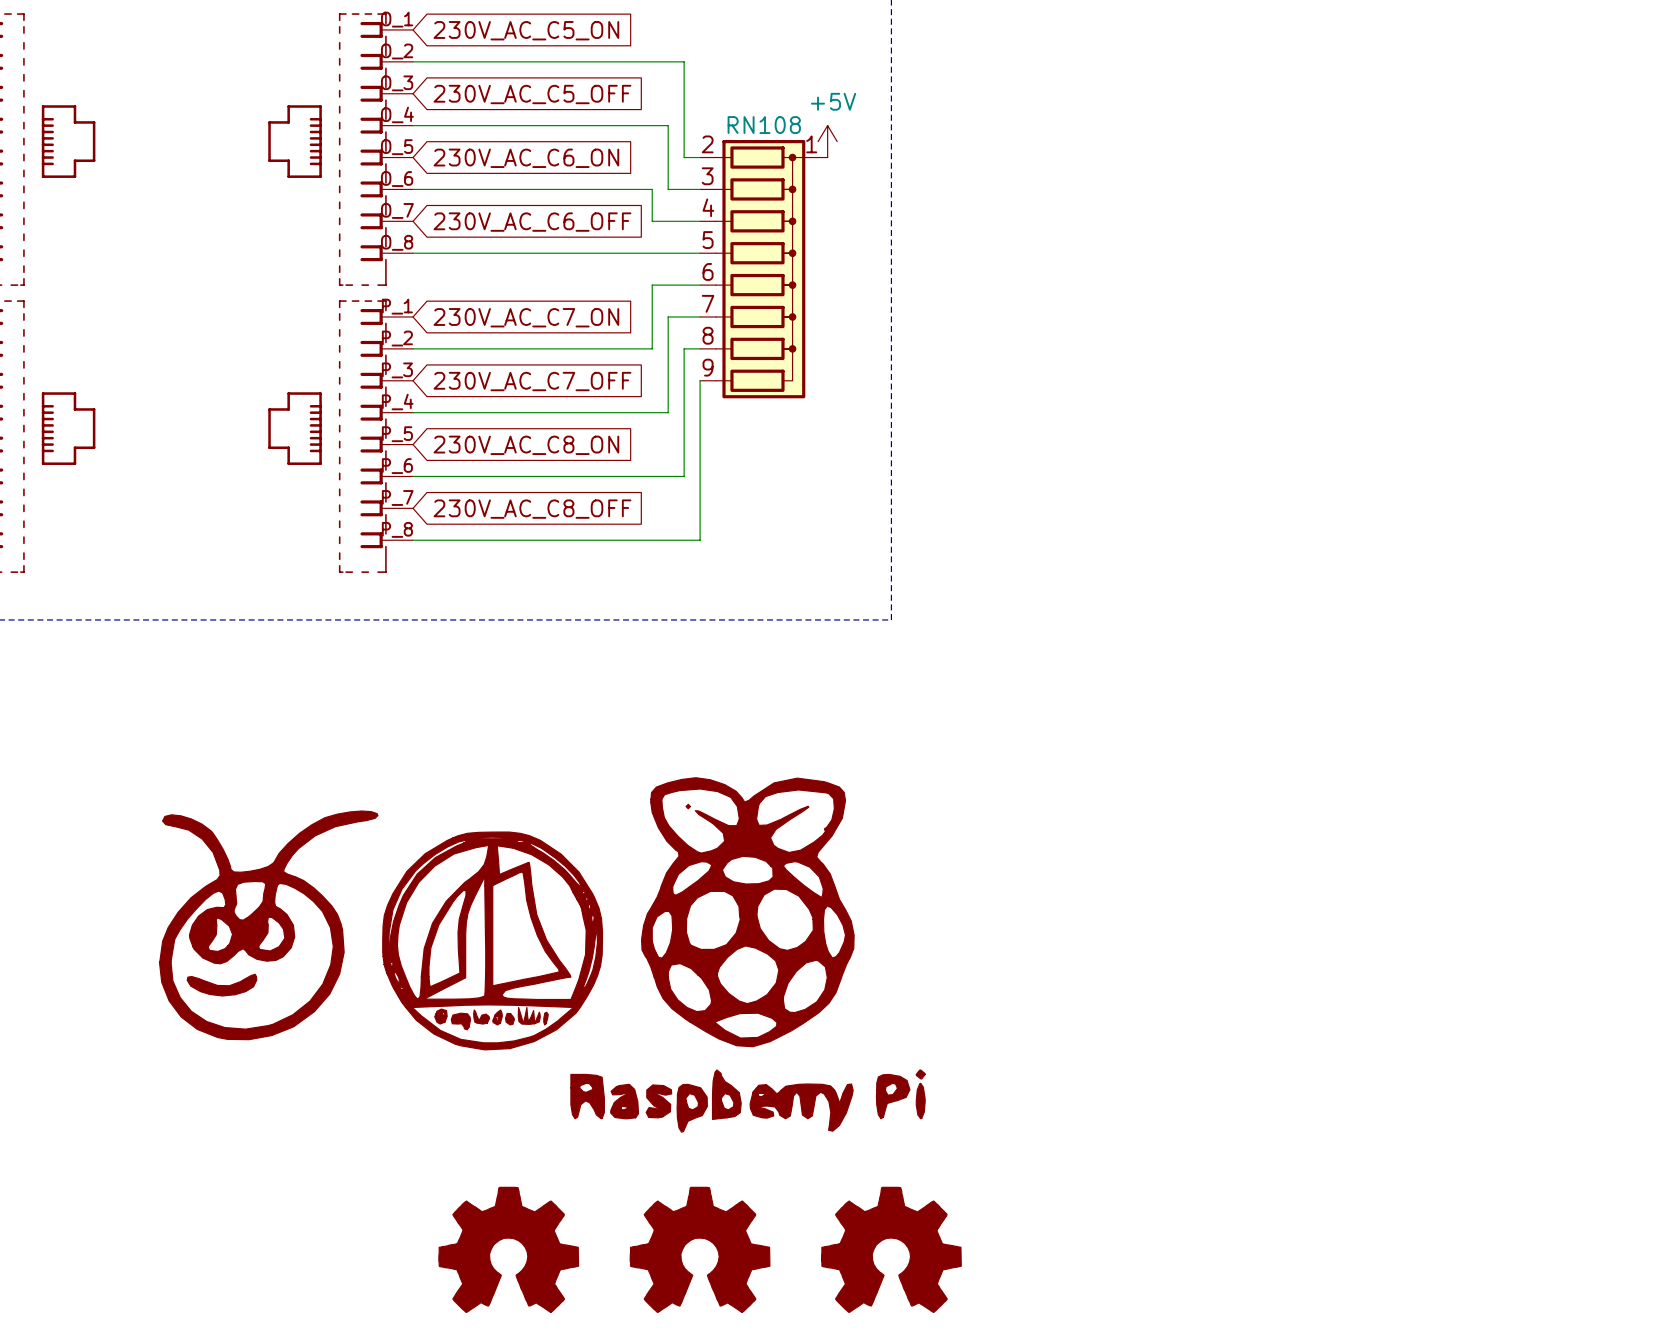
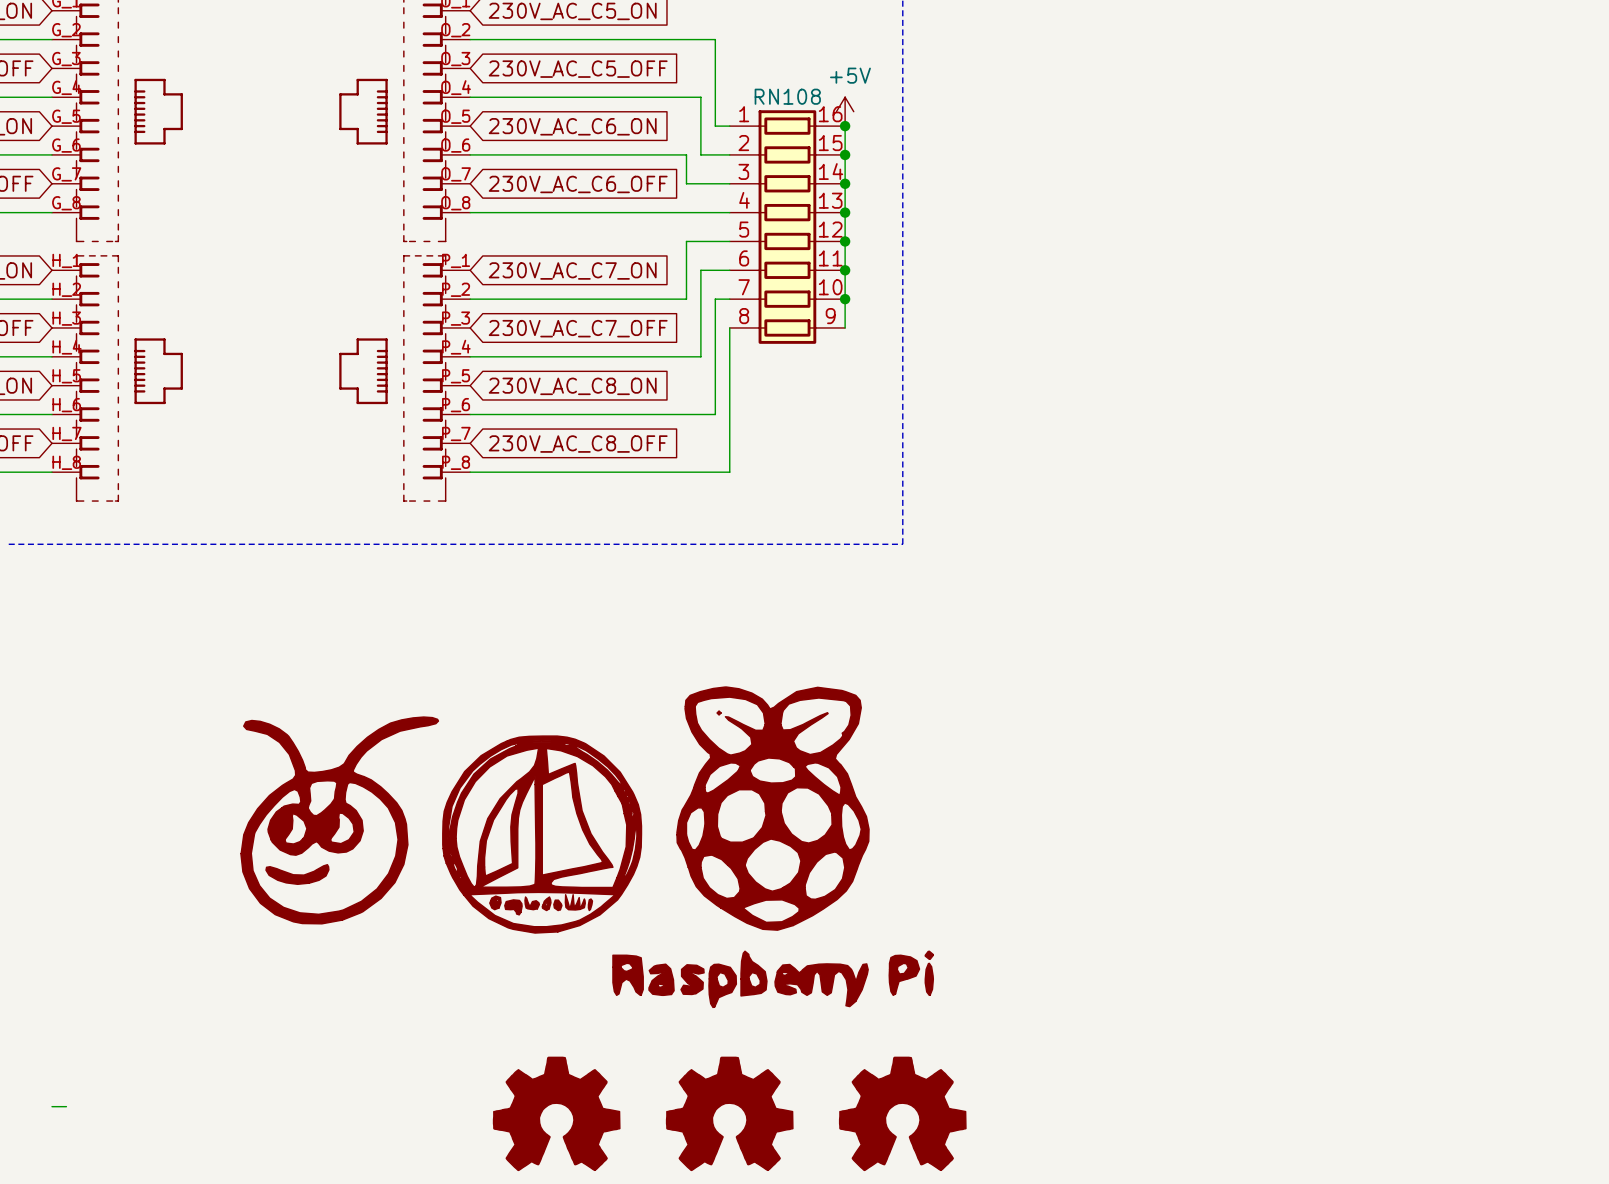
RN108 symbol: [700, 139, 828, 399] -> [729, 110, 846, 344]
wire: none -> (845, 126) (845, 327)
junction: none -> (845, 126)
junction: none -> (845, 154)
junction: none -> (845, 183)
junction: none -> (845, 212)
junction: none -> (845, 241)
junction: none -> (845, 270)
junction: none -> (845, 299)

